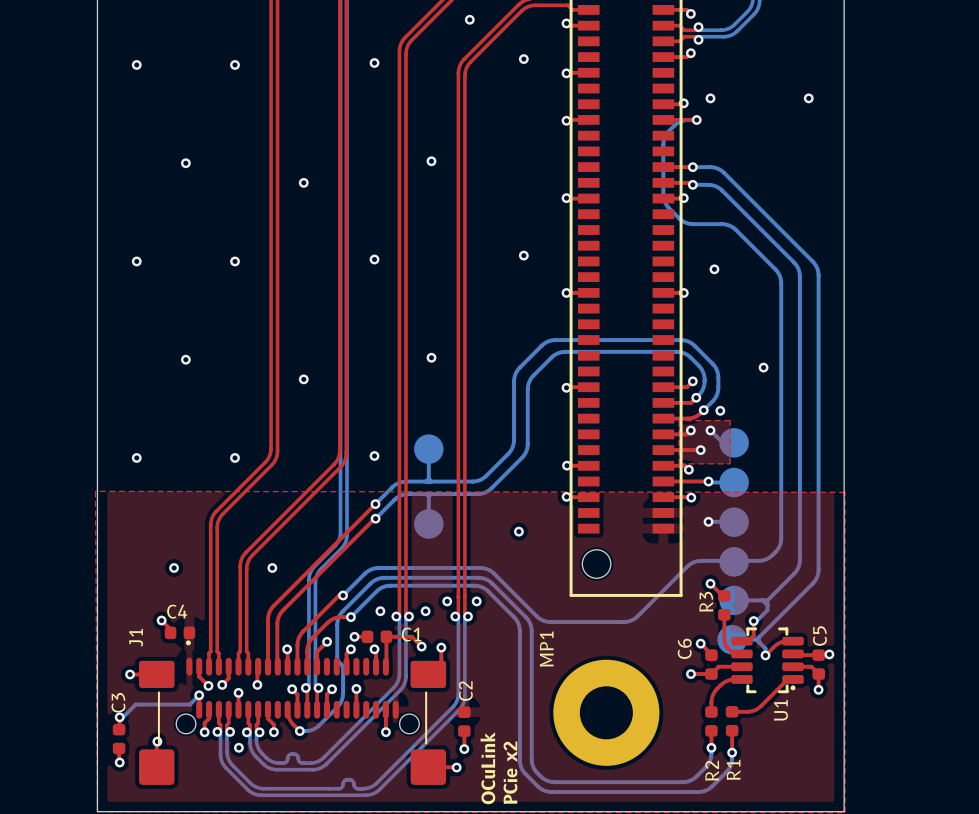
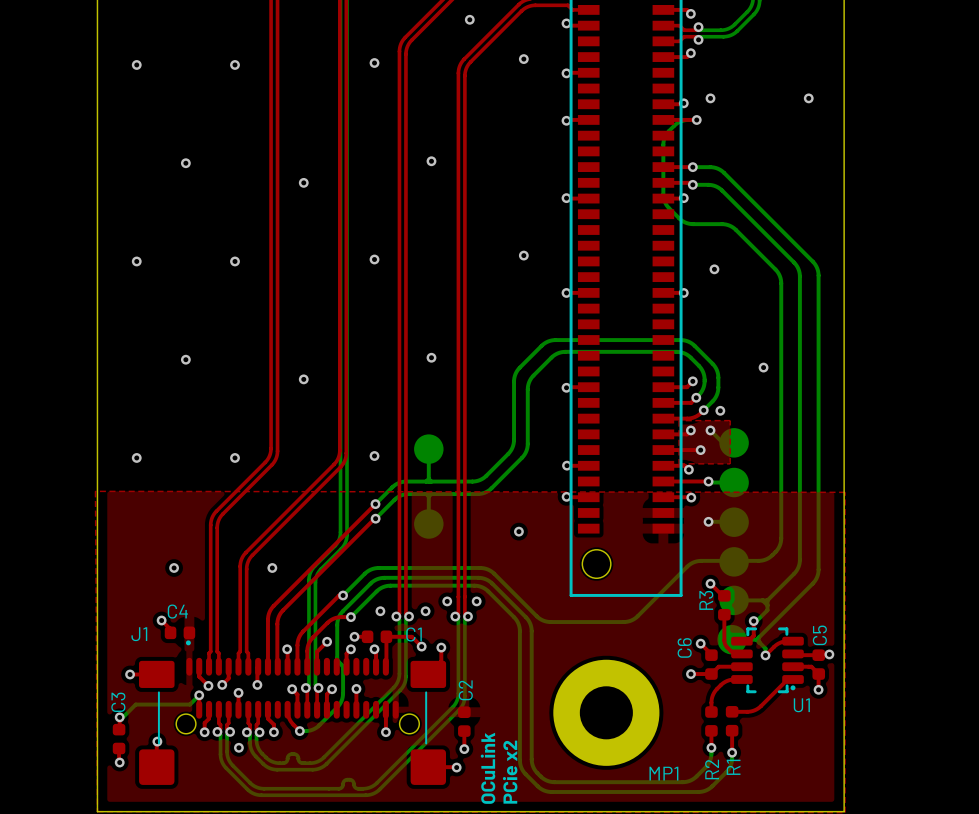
J1 name rotation: 0° (136, 637) -> 90° clockwise (139, 634)
MP1 name rotation: 0° (546, 649) -> 90° clockwise (663, 773)
MP1 name position: MP1 (546, 649) -> MP1 (663, 773)
U1 name rotation: 0° (781, 710) -> 90° clockwise (801, 705)

